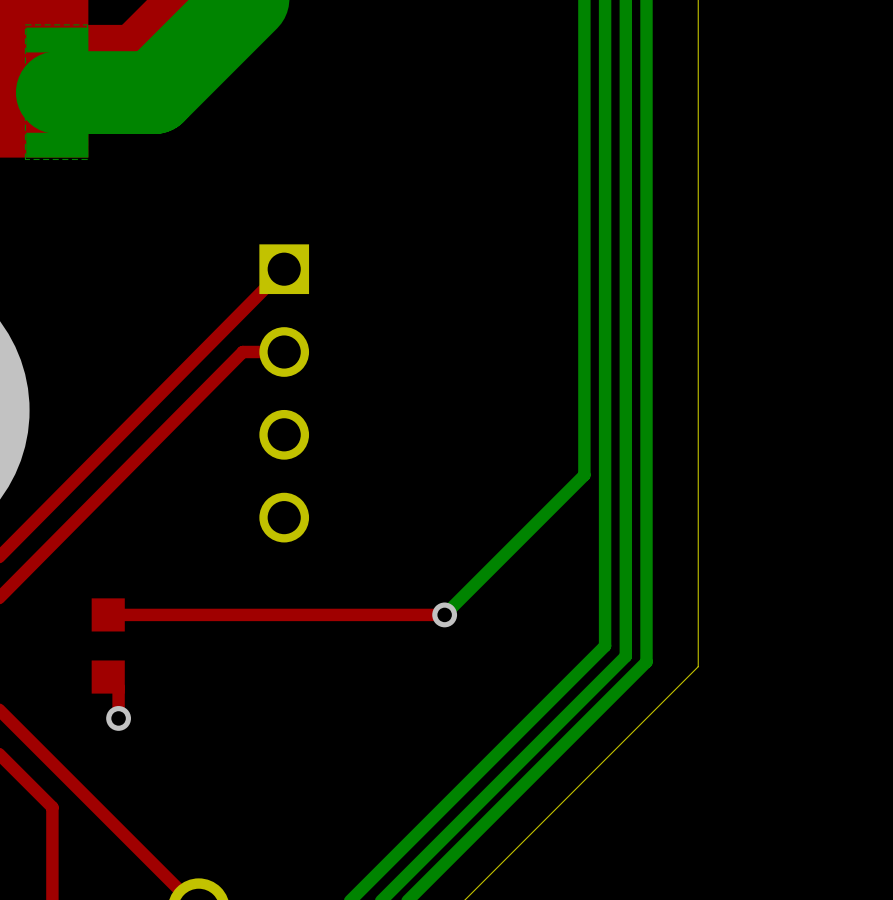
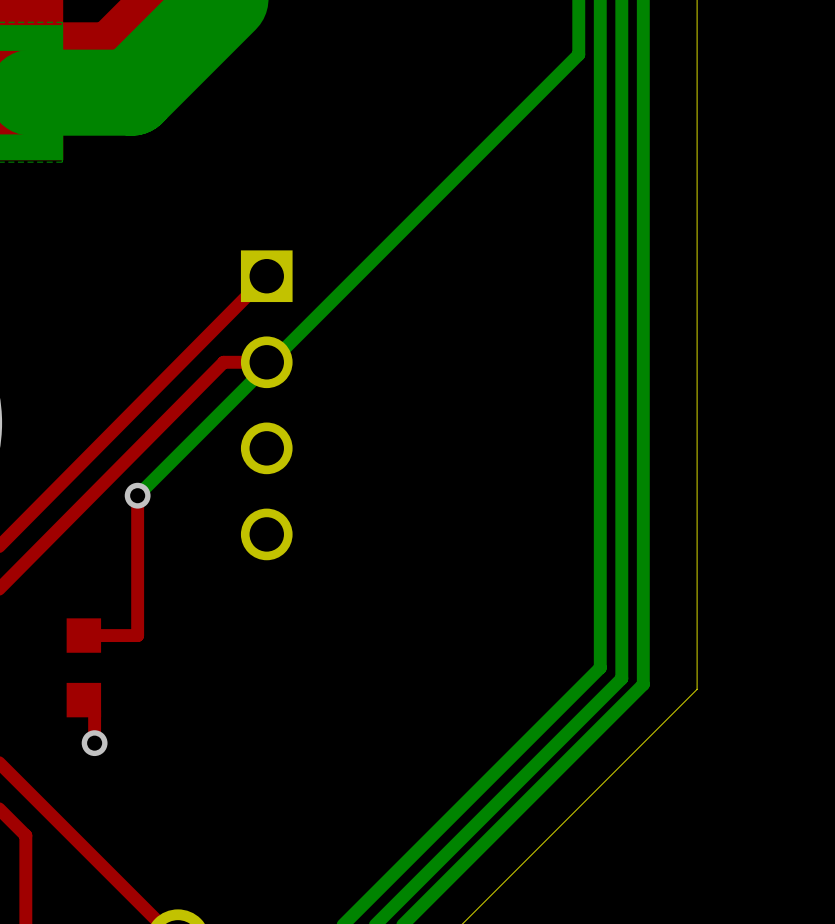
bottom track: (584, 55) (584, 475) (444, 614) -> (578, 54) (137, 495)
via: none -> (137, 495)
top track: (444, 614) (159, 614) -> (137, 495) (137, 635)
via: (444, 614) -> none

